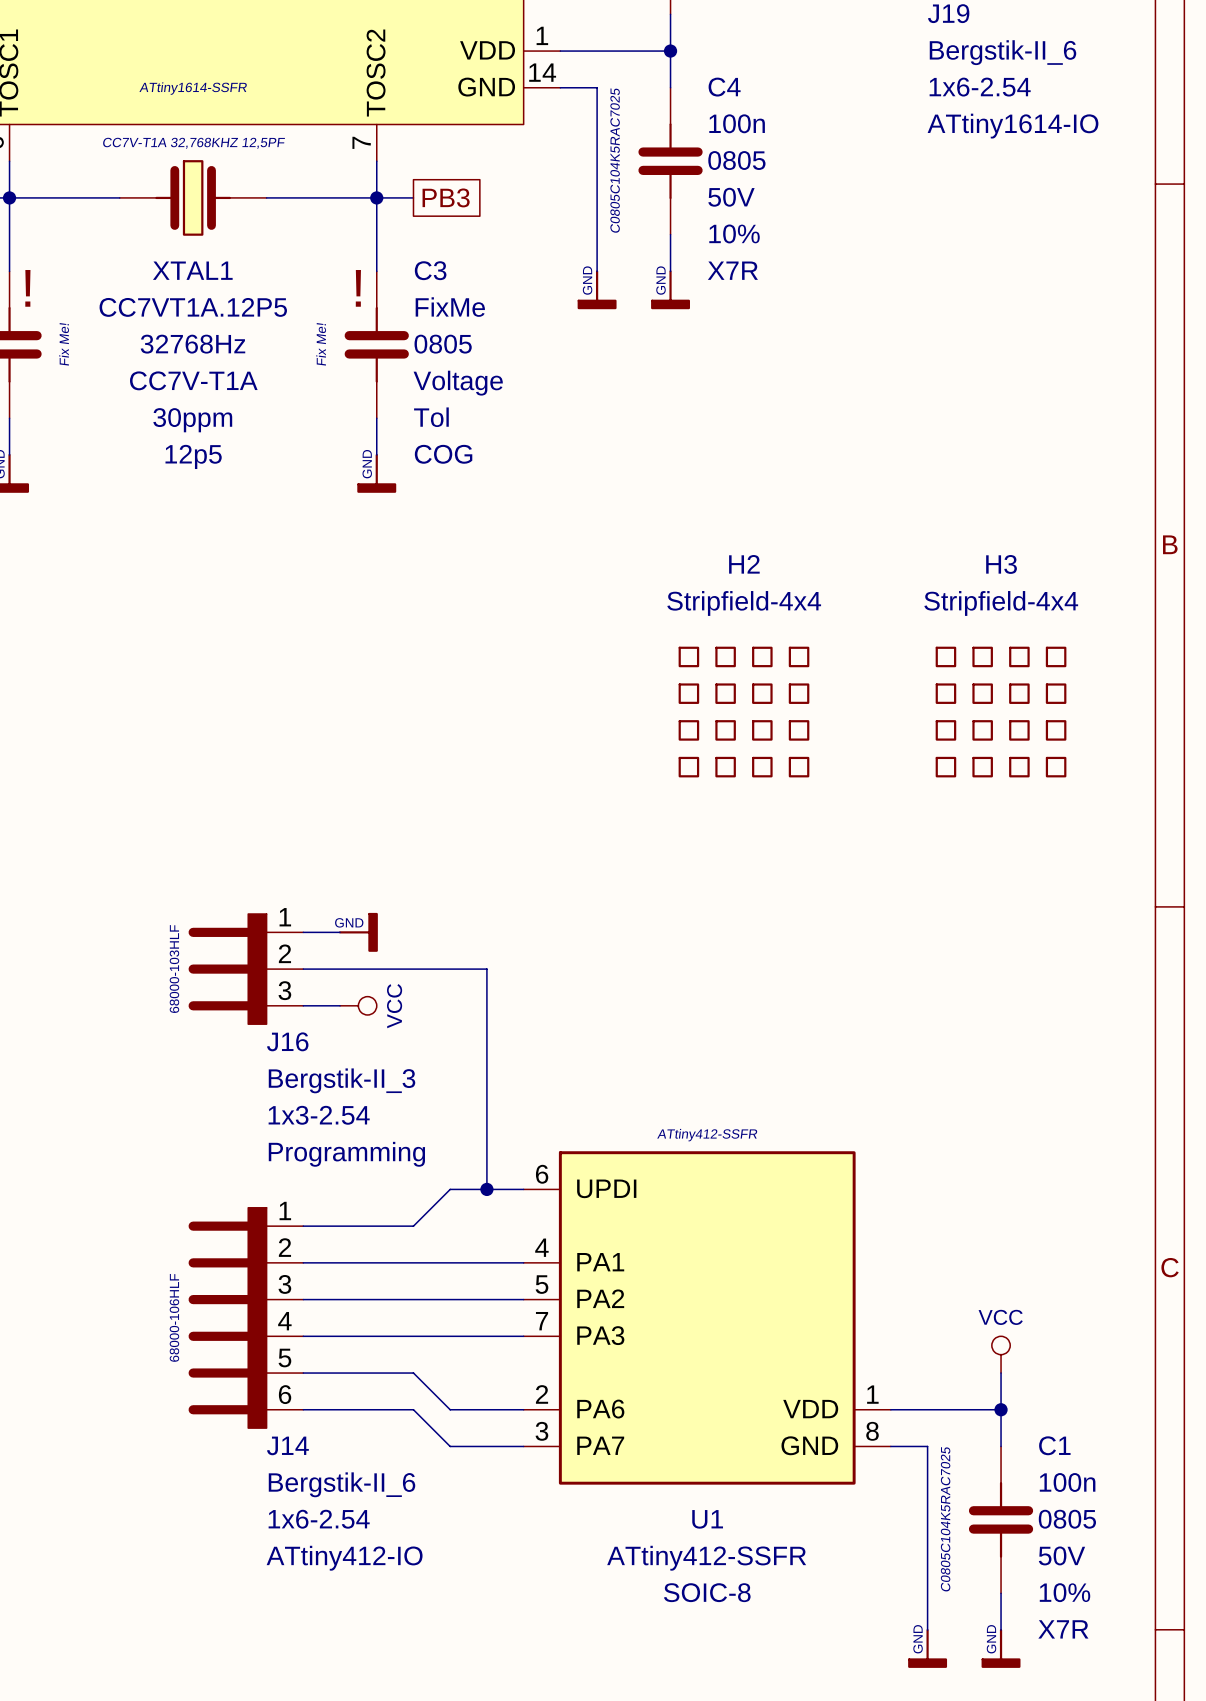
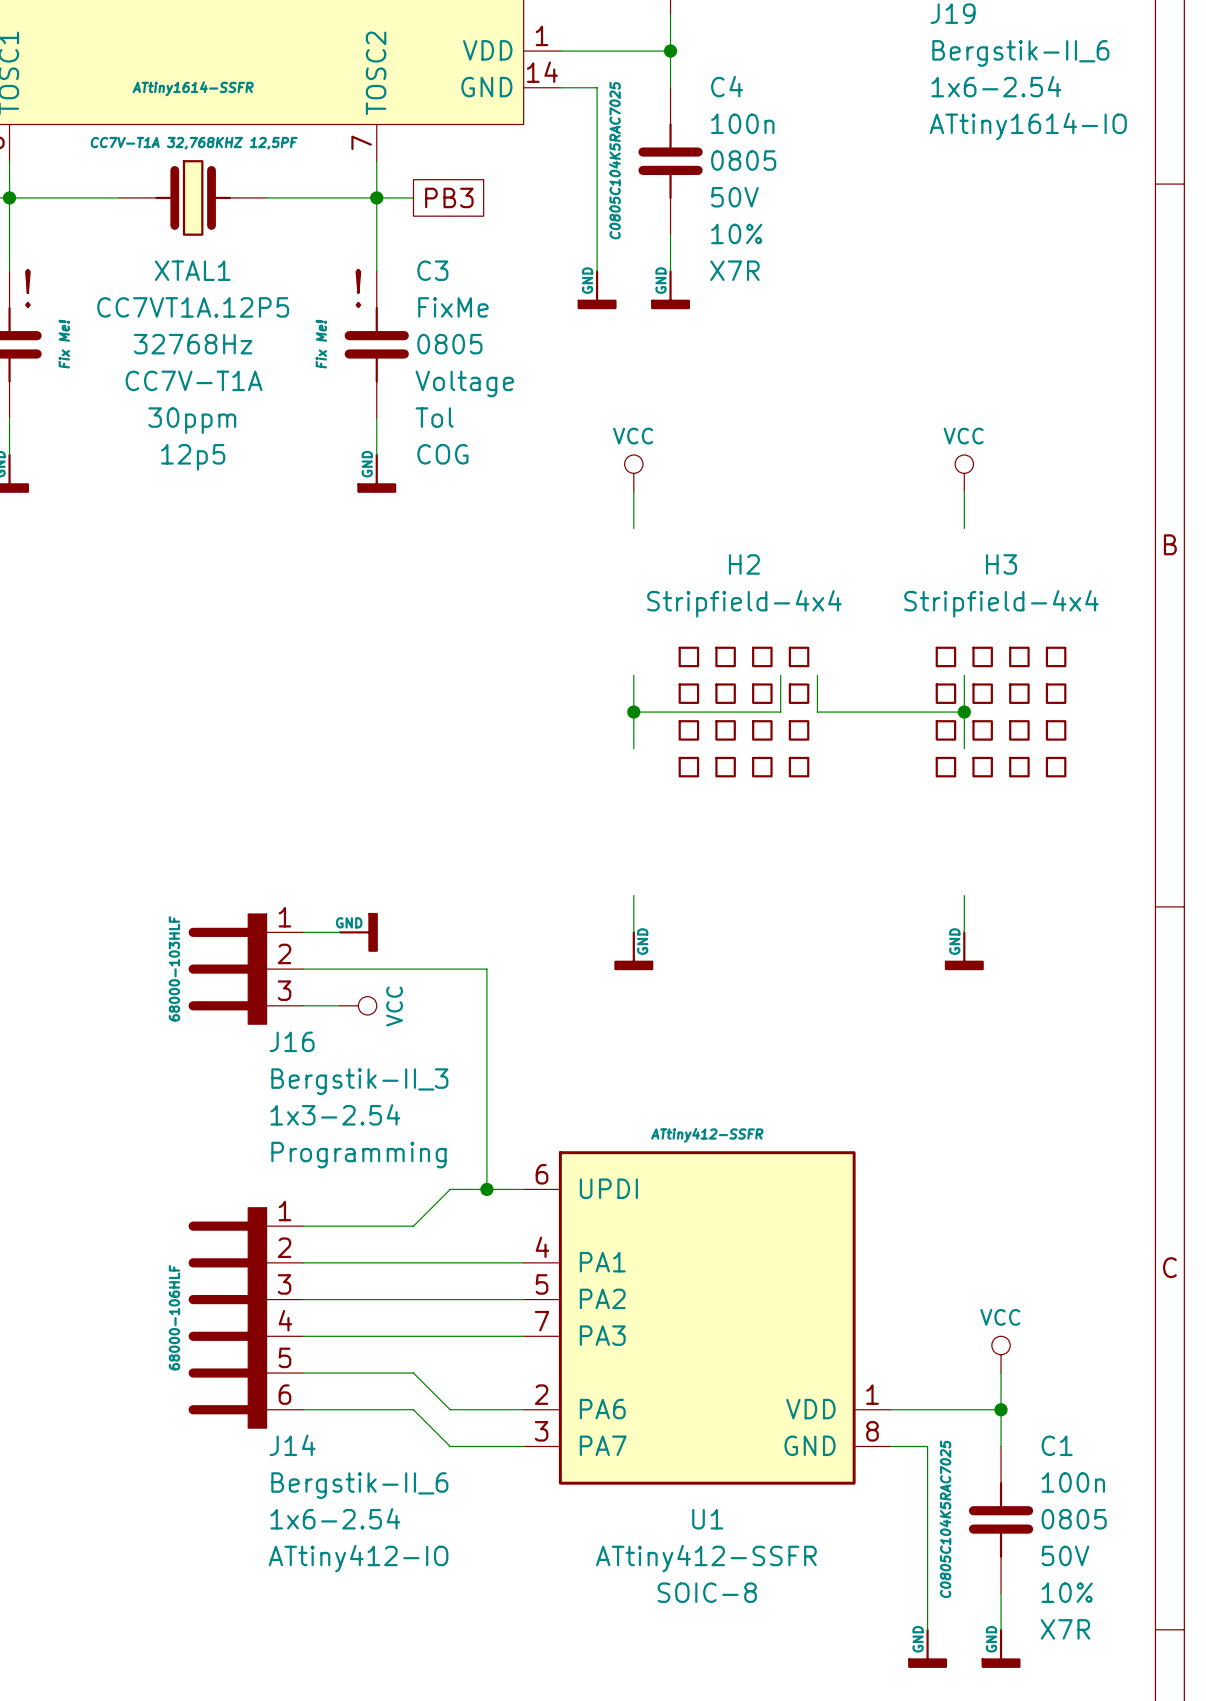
power symbol: none -> VCC (633, 473)
power symbol: none -> VCC (964, 473)
wire: none -> (633, 491) (633, 528)
wire: none -> (964, 491) (964, 528)
wire: none -> (633, 675) (633, 748)
wire: none -> (780, 675) (780, 712) (633, 712)
wire: none -> (817, 675) (817, 712) (964, 712)
wire: none -> (964, 675) (964, 748)
junction: none -> (633, 712)
junction: none -> (964, 712)
wire: none -> (633, 895) (633, 932)
wire: none -> (964, 895) (964, 932)
power symbol: none -> GND (633, 950)
power symbol: none -> GND (964, 950)

